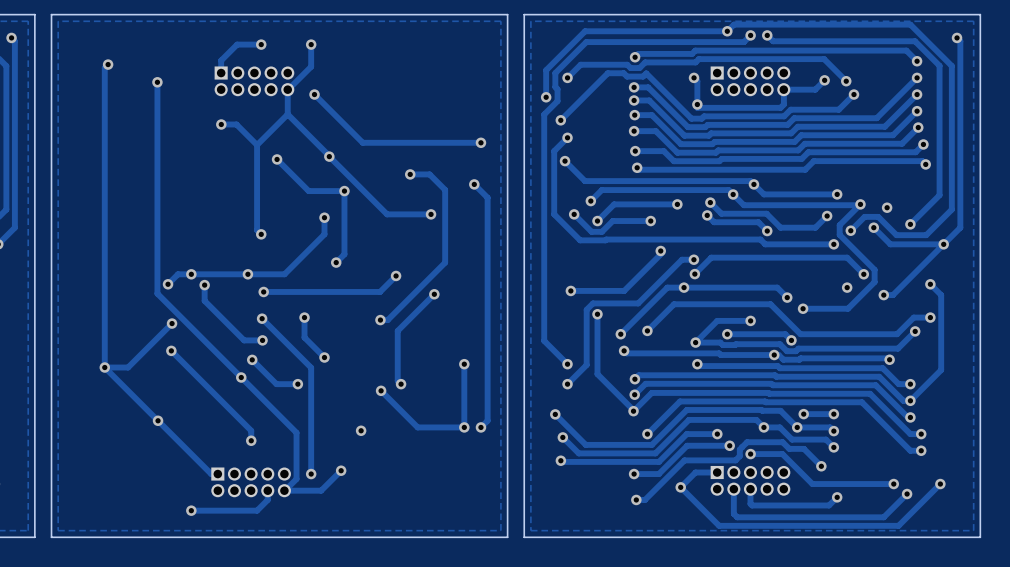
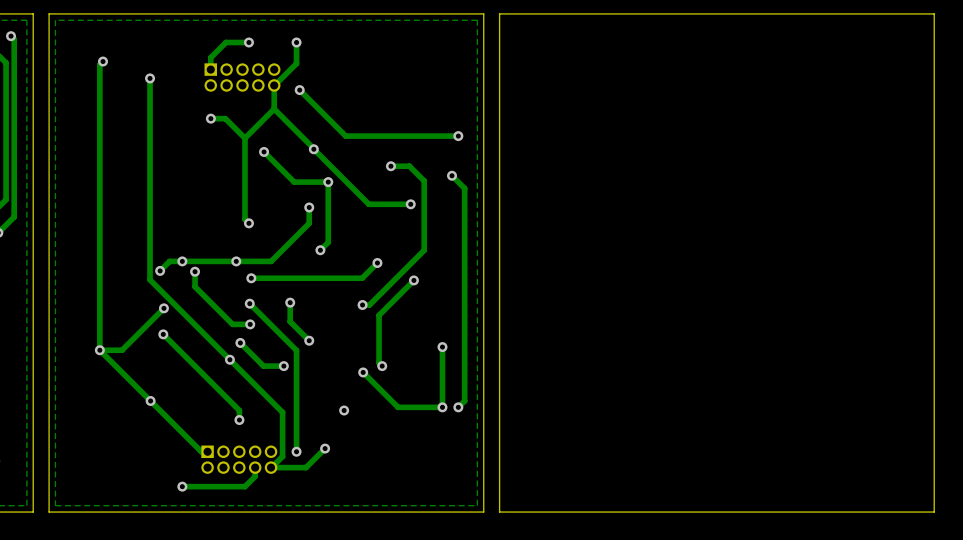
zone outline: (973, 21) (973, 530) (530, 530) (530, 21) (973, 21) -> none
via: (727, 31) -> none
track: (750, 35) (743, 42) (586, 42) (555, 73) (557, 101) (544, 114) (544, 340) (567, 364) -> none
via: (750, 35) -> none
track: (767, 35) (773, 41) (915, 41) (939, 65) (939, 195) (910, 224) -> none
via: (767, 35) -> none
track: (957, 37) (960, 41) (960, 227) (892, 295) (883, 295) -> none
via: (957, 37) -> none
track: (635, 57) (638, 53) (692, 53) (695, 50) (906, 50) (917, 61) -> none
via: (635, 57) -> none
via: (917, 61) -> none
track: (567, 77) (580, 64) (627, 64) (630, 68) (639, 68) (645, 62) (695, 62) (698, 59) (824, 59) (846, 81) -> none
via: (567, 77) -> none
track: (694, 77) (697, 81) (697, 107) (780, 107) (783, 104) (783, 89) (815, 89) (824, 80) -> none
via: (694, 77) -> none
track: (917, 77) (876, 118) (794, 118) (787, 124) (707, 124) (705, 127) (687, 127) (648, 87) (634, 87) -> none
via: (917, 77) -> none
via: (824, 80) -> none
part: (750, 81) -> none
via: (846, 81) -> none
via: (634, 87) -> none
track: (853, 94) (838, 109) (790, 109) (784, 116) (704, 116) (701, 118) (691, 118) (646, 73) (643, 76) (627, 76) (623, 73) (607, 73) (560, 120) -> none
via: (853, 94) -> none
track: (917, 94) (884, 126) (797, 126) (791, 133) (711, 133) (708, 135) (684, 135) (649, 100) (634, 100) -> none
via: (917, 94) -> none
track: (546, 97) (546, 70) (585, 31) (727, 31) (733, 24) (910, 24) (951, 66) (951, 209) (926, 235) (896, 235) (878, 216) (864, 216) (850, 230) -> none
via: (546, 97) -> none
via: (634, 100) -> none
via: (697, 104) -> none
track: (917, 111) (893, 135) (801, 135) (794, 141) (714, 141) (712, 144) (680, 144) (651, 115) (634, 115) -> none
via: (917, 111) -> none
via: (634, 115) -> none
via: (560, 120) -> none
track: (918, 127) (902, 143) (804, 143) (798, 150) (718, 150) (715, 152) (677, 152) (655, 131) (634, 131) -> none
via: (918, 127) -> none
via: (634, 131) -> none
track: (567, 137) (554, 151) (554, 214) (580, 240) (760, 239) (765, 244) (833, 244) -> none
via: (567, 137) -> none
track: (923, 144) (915, 152) (808, 152) (801, 158) (721, 158) (719, 161) (673, 161) (663, 151) (635, 151) -> none
via: (923, 144) -> none
via: (635, 151) -> none
track: (565, 161) (584, 181) (750, 181) (763, 194) (837, 194) -> none
via: (565, 161) -> none
track: (925, 164) (922, 161) (813, 161) (805, 169) (639, 169) (637, 167) -> none
via: (925, 164) -> none
via: (637, 167) -> none
via: (753, 184) -> none
via: (733, 194) -> none
via: (837, 194) -> none
track: (590, 201) (601, 190) (728, 190) (743, 205) (859, 205) -> none
via: (590, 201) -> none
track: (710, 202) (721, 213) (766, 213) (780, 227) (815, 227) (827, 216) -> none
via: (710, 202) -> none
track: (677, 204) (614, 204) (597, 221) -> none
via: (677, 204) -> none
track: (860, 204) (839, 225) (839, 234) (874, 269) (874, 282) (847, 308) (803, 308) -> none
via: (860, 204) -> none
via: (887, 207) -> none
track: (574, 214) (591, 231) (601, 231) (612, 221) (650, 221) -> none
via: (574, 214) -> none
track: (707, 215) (714, 222) (758, 222) (767, 231) -> none
via: (707, 215) -> none
via: (827, 216) -> none
via: (597, 221) -> none
via: (650, 221) -> none
via: (910, 224) -> none
track: (873, 227) (890, 244) (943, 244) -> none
via: (873, 227) -> none
via: (850, 230) -> none
via: (767, 231) -> none
via: (833, 244) -> none
via: (943, 244) -> none
track: (660, 251) (660, 254) (624, 290) (570, 290) -> none
via: (660, 251) -> none
track: (693, 259) (681, 259) (638, 303) (593, 303) (586, 309) (586, 365) (567, 384) -> none
via: (693, 259) -> none
track: (694, 274) (711, 257) (847, 257) (863, 274) -> none
via: (694, 274) -> none
via: (863, 274) -> none
track: (930, 284) (941, 295) (941, 370) (910, 400) (903, 400) (879, 376) (638, 375) (634, 379) -> none
via: (930, 284) -> none
via: (684, 287) -> none
via: (847, 287) -> none
via: (570, 290) -> none
via: (883, 295) -> none
track: (787, 297) (777, 287) (667, 287) (620, 334) -> none
via: (787, 297) -> none
via: (803, 308) -> none
track: (597, 314) (597, 374) (633, 411) (651, 392) (870, 393) (910, 434) (921, 434) -> none
via: (597, 314) -> none
track: (930, 317) (913, 317) (897, 334) (800, 334) (770, 304) (674, 304) (647, 330) -> none
via: (930, 317) -> none
track: (750, 320) (717, 320) (695, 342) (720, 342) (722, 345) (779, 344) (786, 351) (795, 351) (798, 348) (897, 348) (915, 331) -> none
via: (750, 320) -> none
via: (647, 330) -> none
via: (915, 331) -> none
via: (620, 334) -> none
track: (727, 334) (785, 334) (791, 340) -> none
via: (727, 334) -> none
via: (791, 340) -> none
via: (695, 342) -> none
track: (624, 350) (626, 353) (778, 355) (783, 359) (889, 359) -> none
via: (624, 350) -> none
via: (774, 355) -> none
via: (889, 359) -> none
via: (567, 364) -> none
track: (697, 364) (699, 366) (777, 366) (779, 368) (882, 368) (898, 384) (910, 384) -> none
via: (697, 364) -> none
via: (634, 379) -> none
via: (567, 384) -> none
via: (910, 384) -> none
track: (634, 394) (645, 383) (875, 385) (907, 417) (910, 417) -> none
via: (634, 394) -> none
via: (910, 400) -> none
via: (633, 411) -> none
track: (555, 414) (585, 444) (651, 444) (686, 409) (780, 410) (797, 427) (830, 427) (833, 431) -> none
via: (555, 414) -> none
via: (803, 414) -> none
track: (833, 414) (803, 414) -> none
via: (833, 414) -> none
via: (910, 417) -> none
via: (763, 427) -> none
via: (797, 427) -> none
via: (833, 431) -> none
track: (647, 434) (680, 401) (861, 402) (910, 450) (921, 450) -> none
via: (647, 434) -> none
track: (717, 434) (686, 434) (658, 461) (560, 460) -> none
via: (717, 434) -> none
via: (921, 434) -> none
track: (562, 437) (578, 453) (655, 453) (688, 419) (756, 419) (763, 427) (779, 427) (792, 439) (826, 439) (833, 447) -> none
via: (562, 437) -> none
track: (729, 445) (687, 445) (658, 474) (634, 474) -> none
via: (729, 445) -> none
via: (833, 447) -> none
via: (921, 450) -> none
track: (750, 454) (782, 454) (812, 484) (893, 484) -> none
via: (750, 454) -> none
via: (560, 460) -> none
track: (821, 466) (803, 448) (789, 448) (782, 442) (747, 442) (739, 449) (739, 456) (735, 460) (684, 460) (644, 499) (636, 499) -> none
via: (821, 466) -> none
track: (717, 472) (695, 472) (680, 487) (719, 525) (898, 525) (940, 484) -> none
via: (634, 474) -> none
part: (750, 480) -> none
via: (893, 484) -> none
via: (940, 484) -> none
via: (680, 487) -> none
track: (733, 489) (733, 513) (737, 517) (883, 517) (907, 494) -> none
track: (750, 489) (752, 505) (829, 505) (837, 497) -> none
via: (907, 494) -> none
via: (837, 497) -> none
via: (636, 499) -> none

